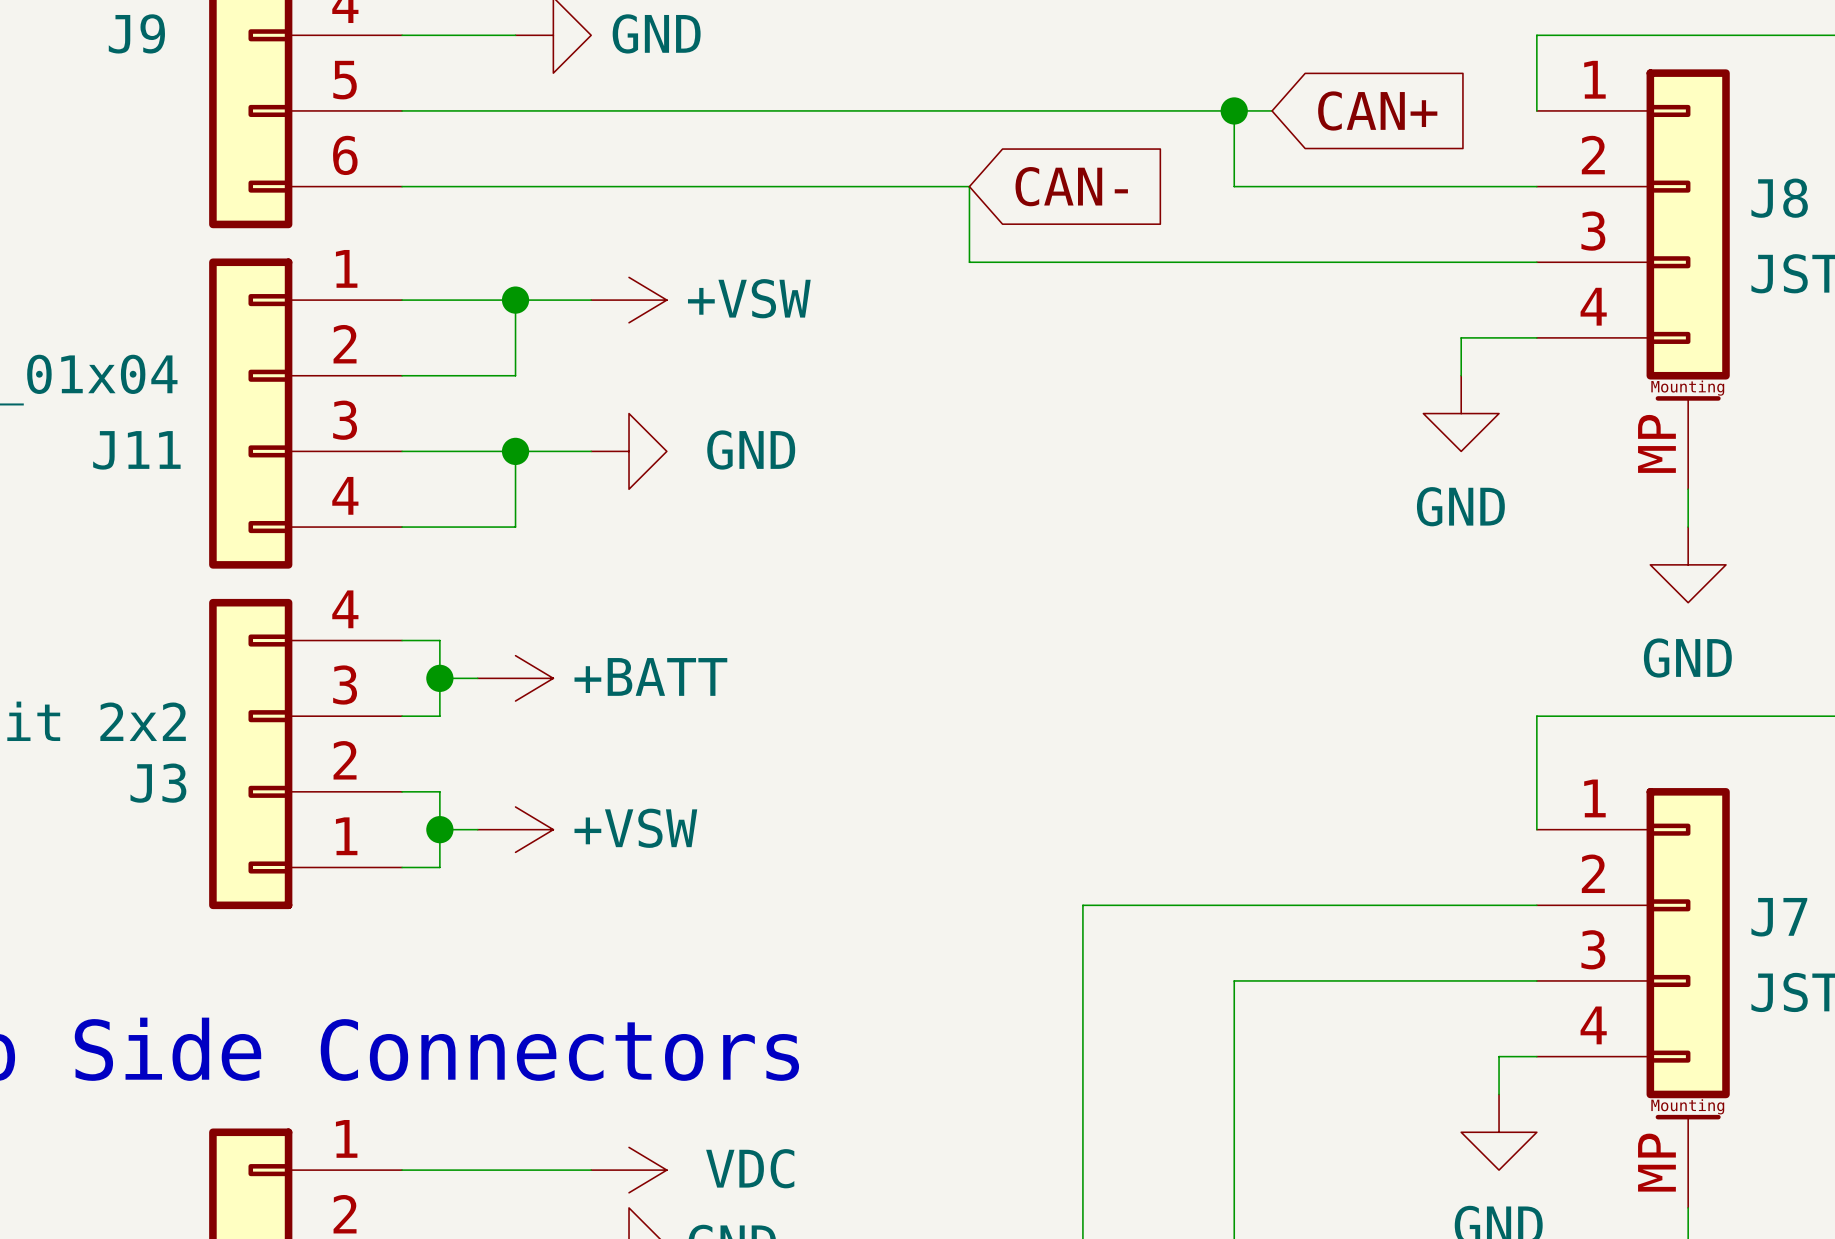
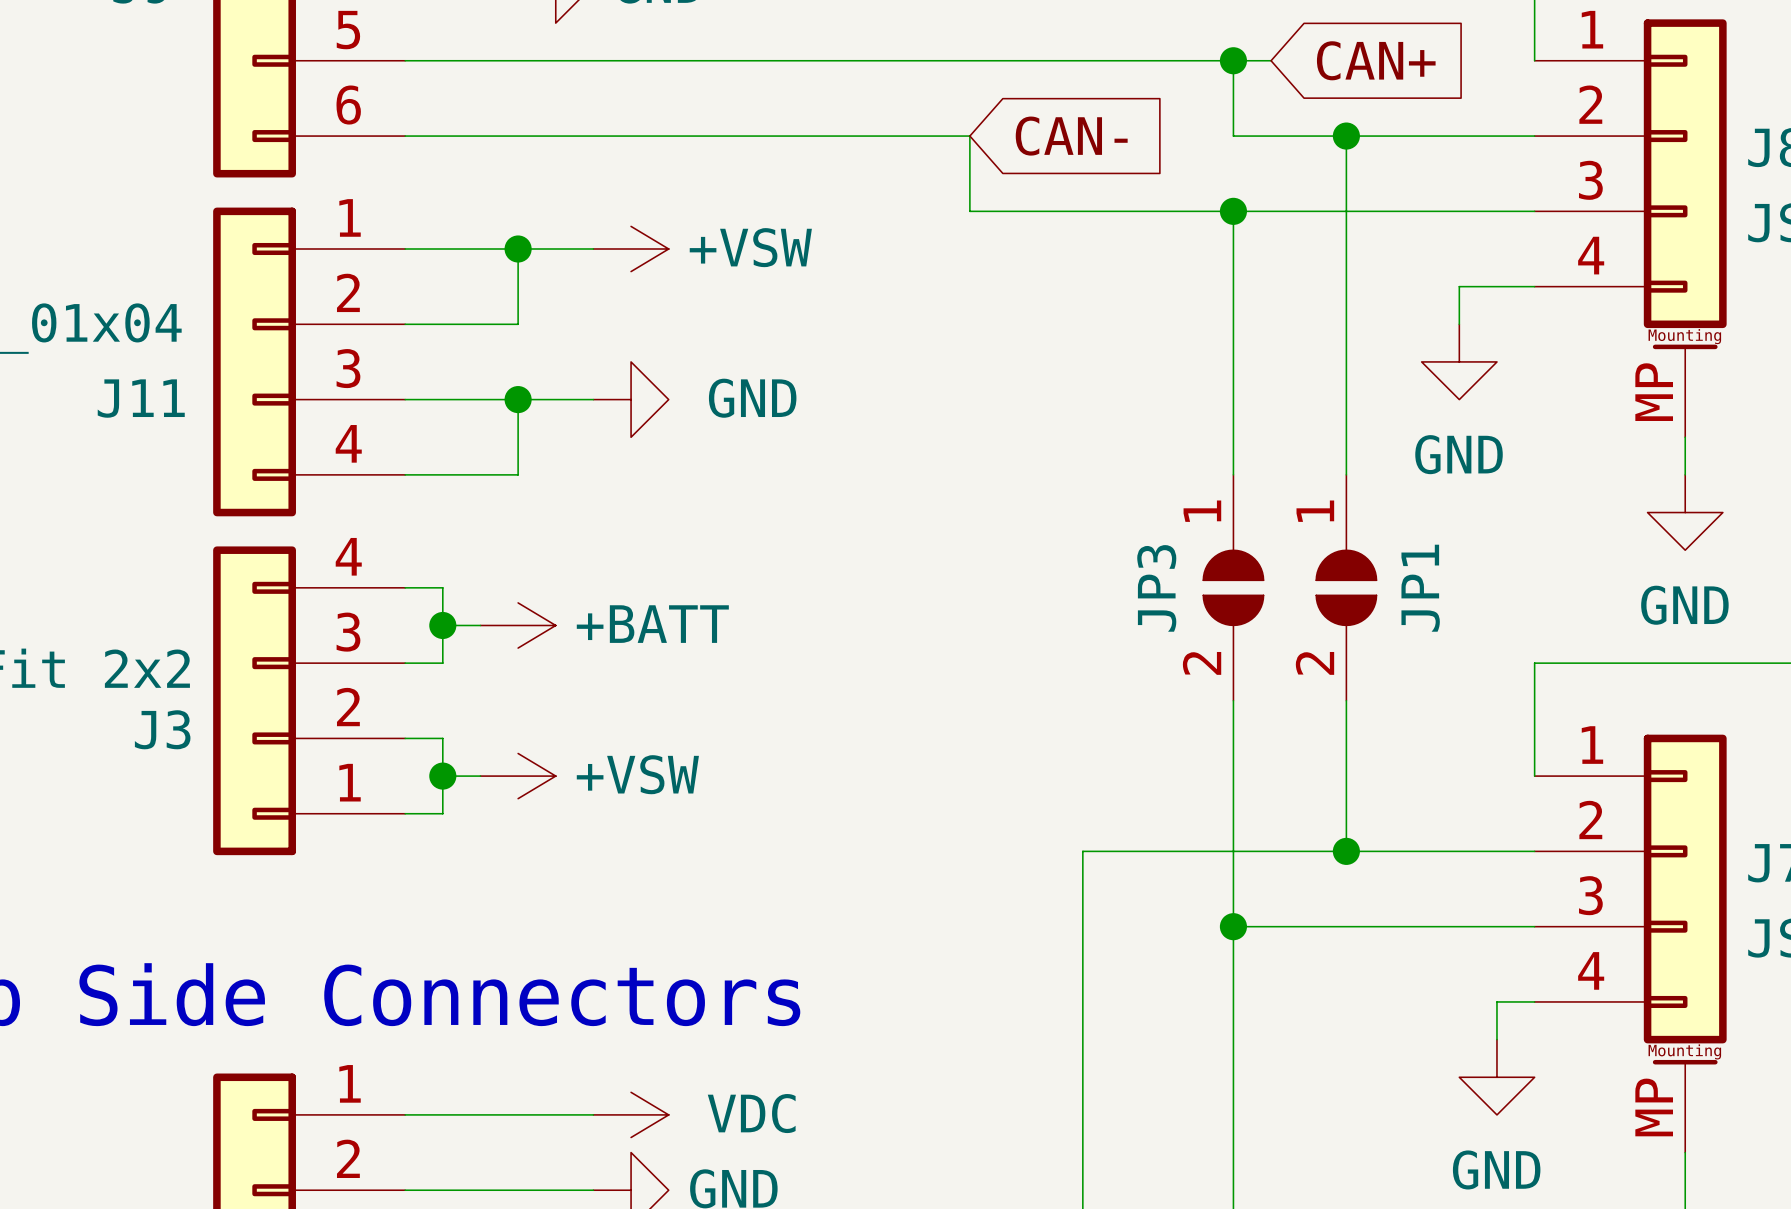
wire: none -> (1346, 136) (1346, 474)
junction: none -> (1346, 136)
wire: none -> (1233, 211) (1233, 474)
junction: none -> (1233, 211)
JP3: none -> (1233, 587)
JP1: none -> (1346, 587)
wire: none -> (1233, 700) (1233, 926)
wire: none -> (1346, 700) (1346, 851)
junction: none -> (1346, 851)
junction: none -> (1233, 926)

